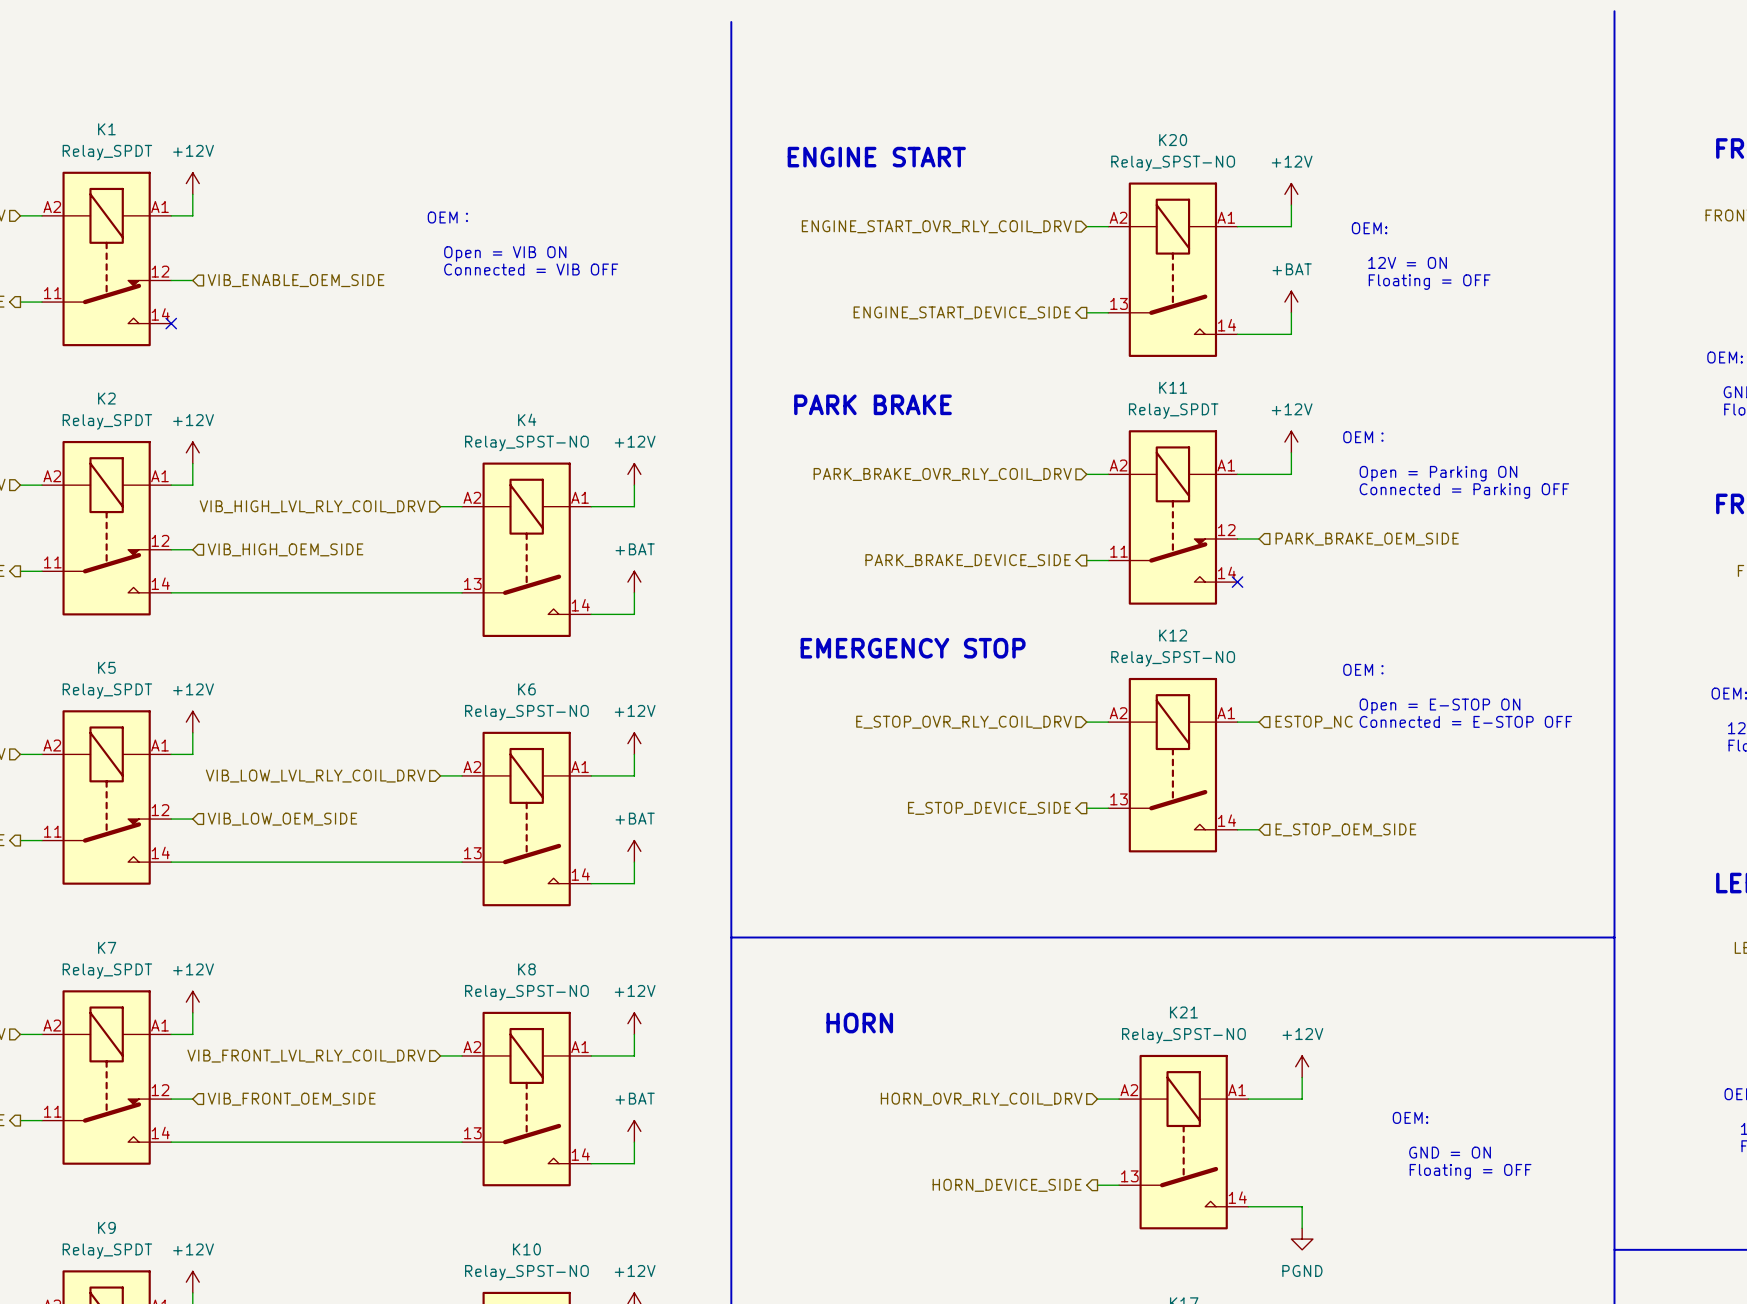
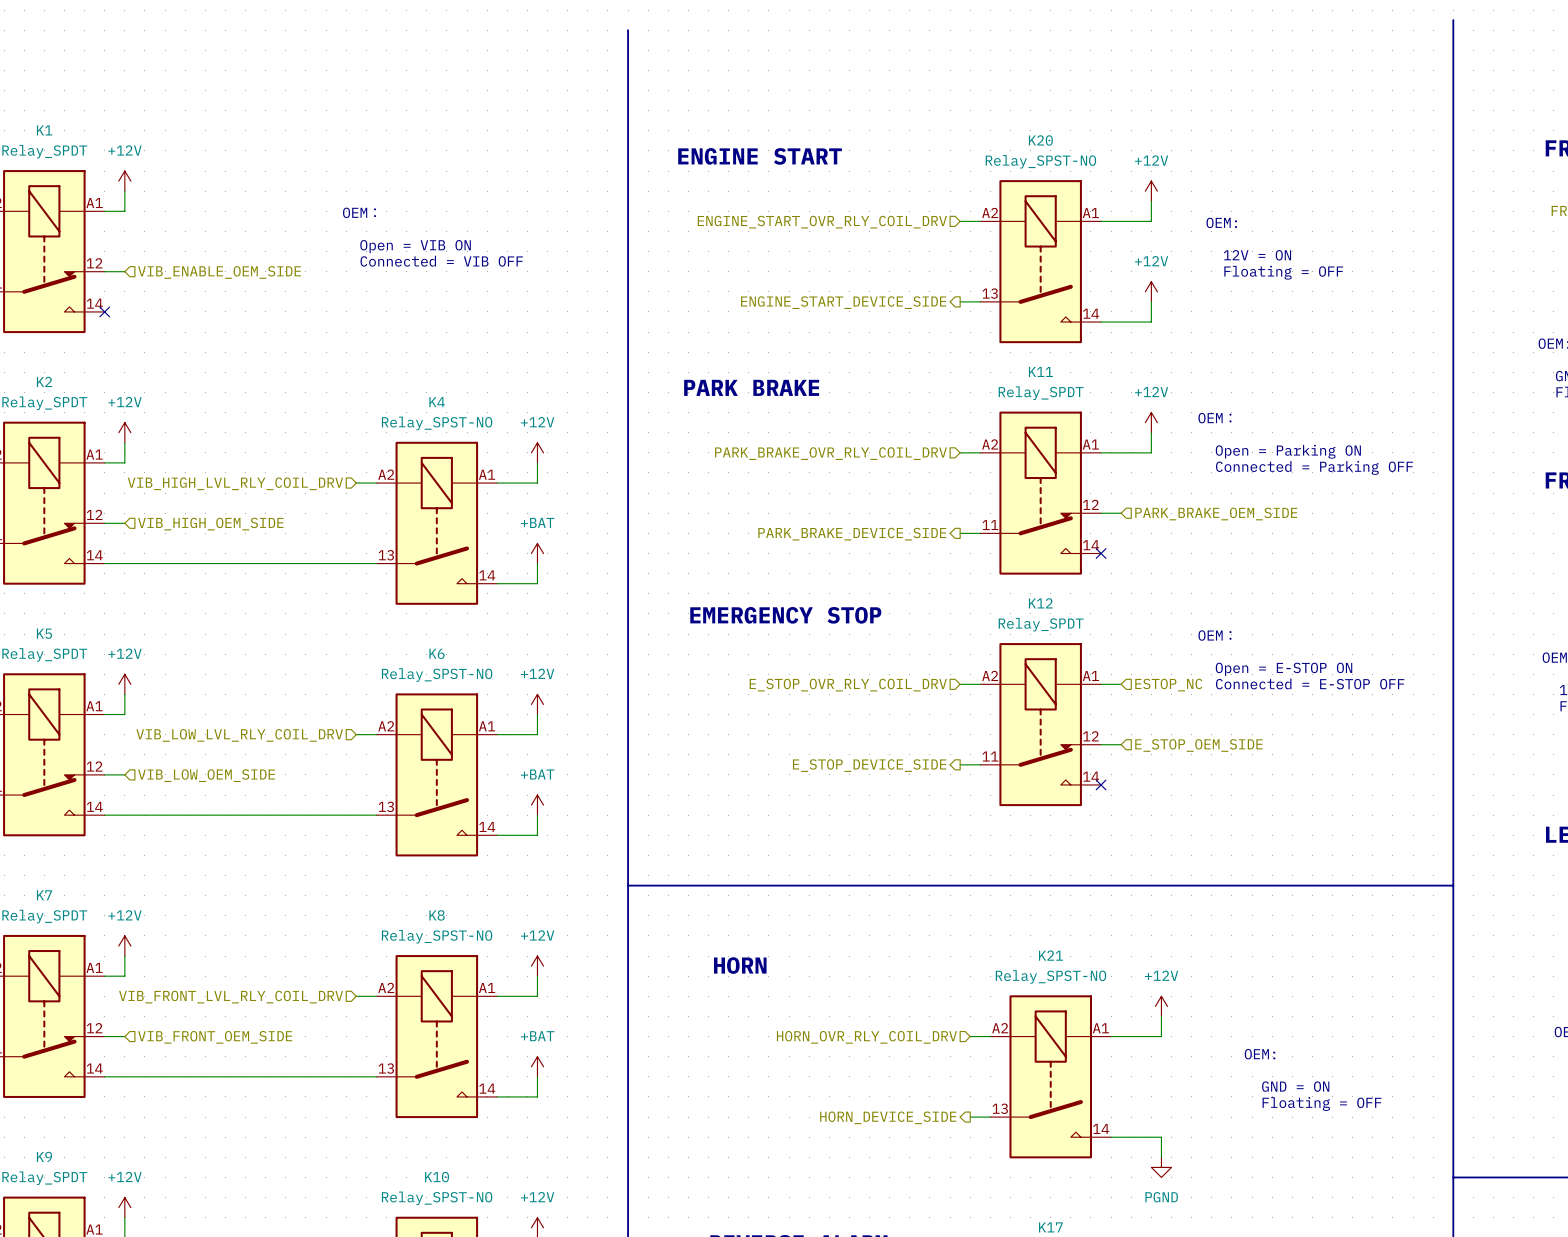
power symbol: +BAT (1291, 302) -> +12V (1151, 291)
K12 value: Relay_SPST-NO (1173, 658) -> Relay_SPDT (1041, 624)
K12 symbol: [1108, 677, 1238, 853] -> [980, 643, 1102, 807]
wire: (1237, 829) (1259, 829) -> (1101, 744) (1121, 744)
no-connect mark: none -> (1101, 784)
hierarchical label position: E_STOP_OEM_SIDE (1345, 829) -> E_STOP_OEM_SIDE (1198, 745)

